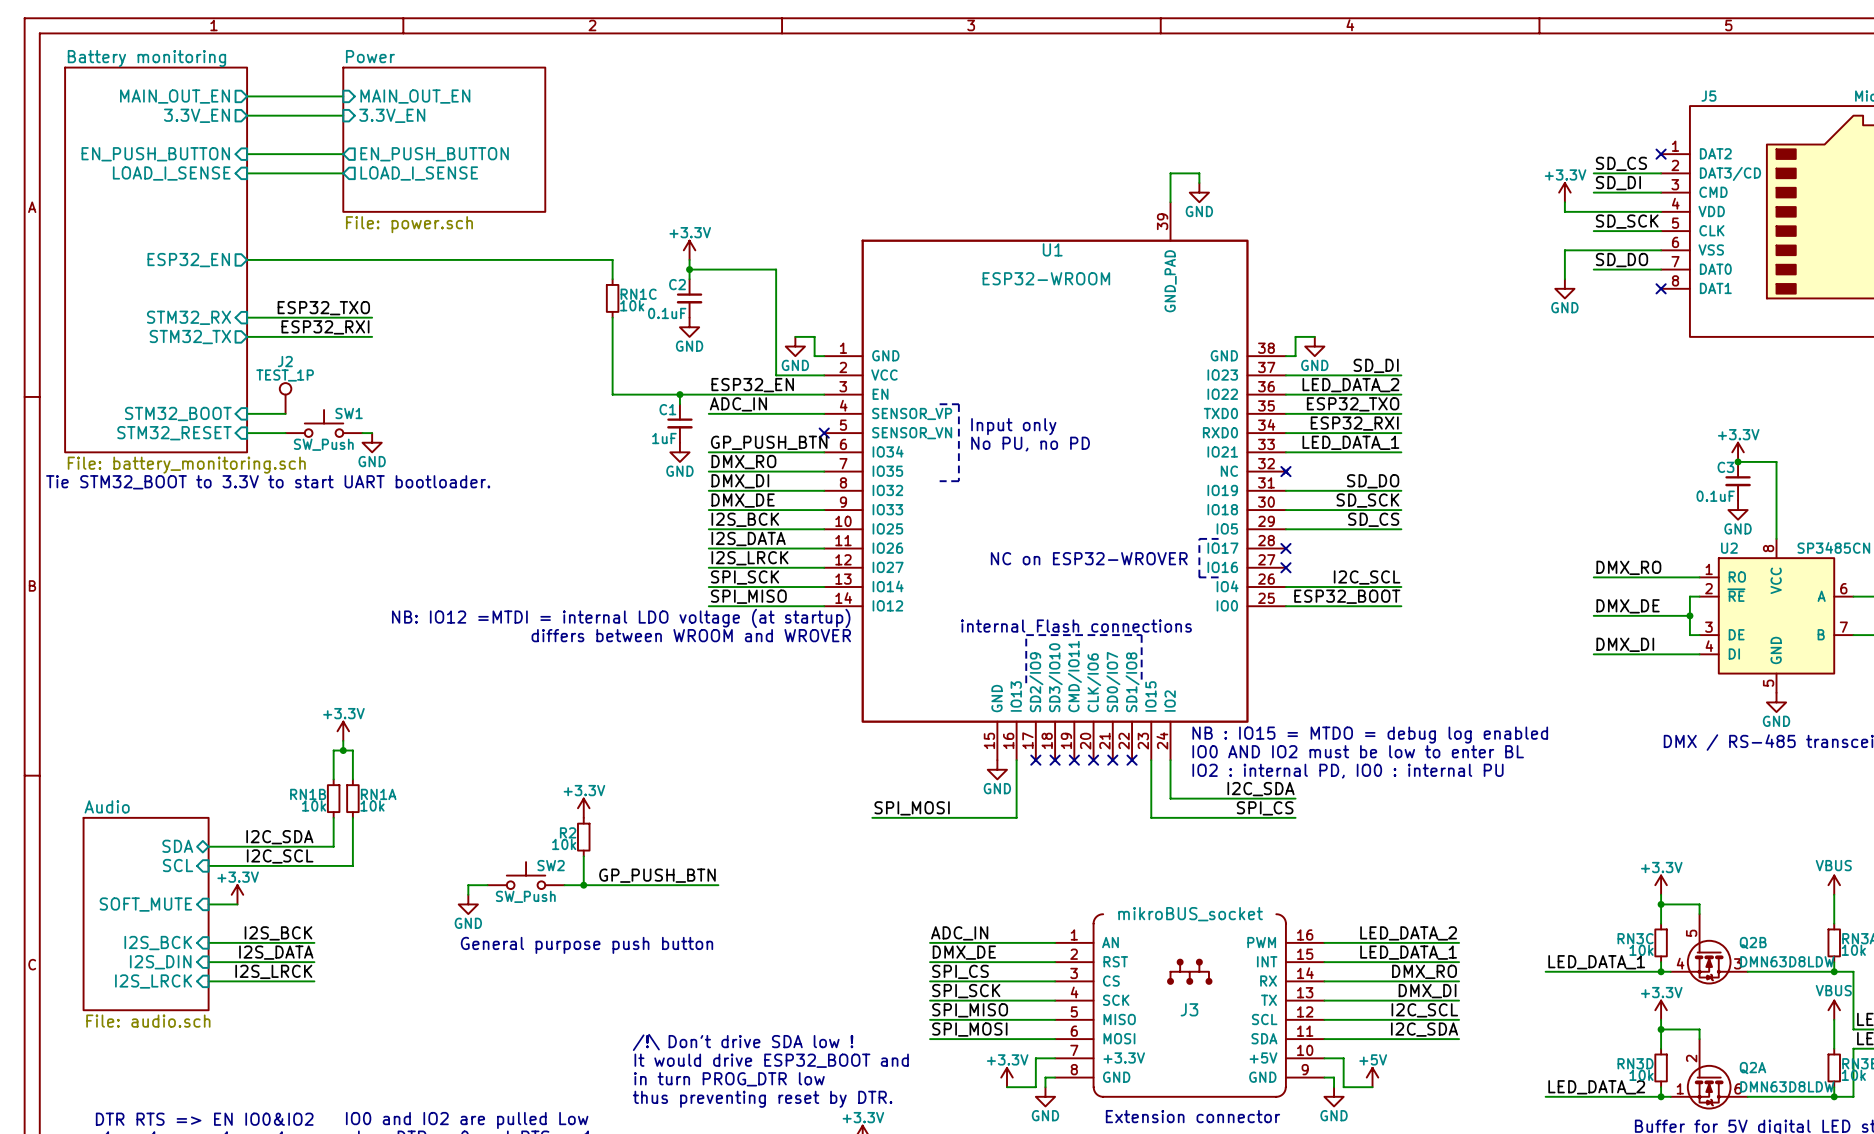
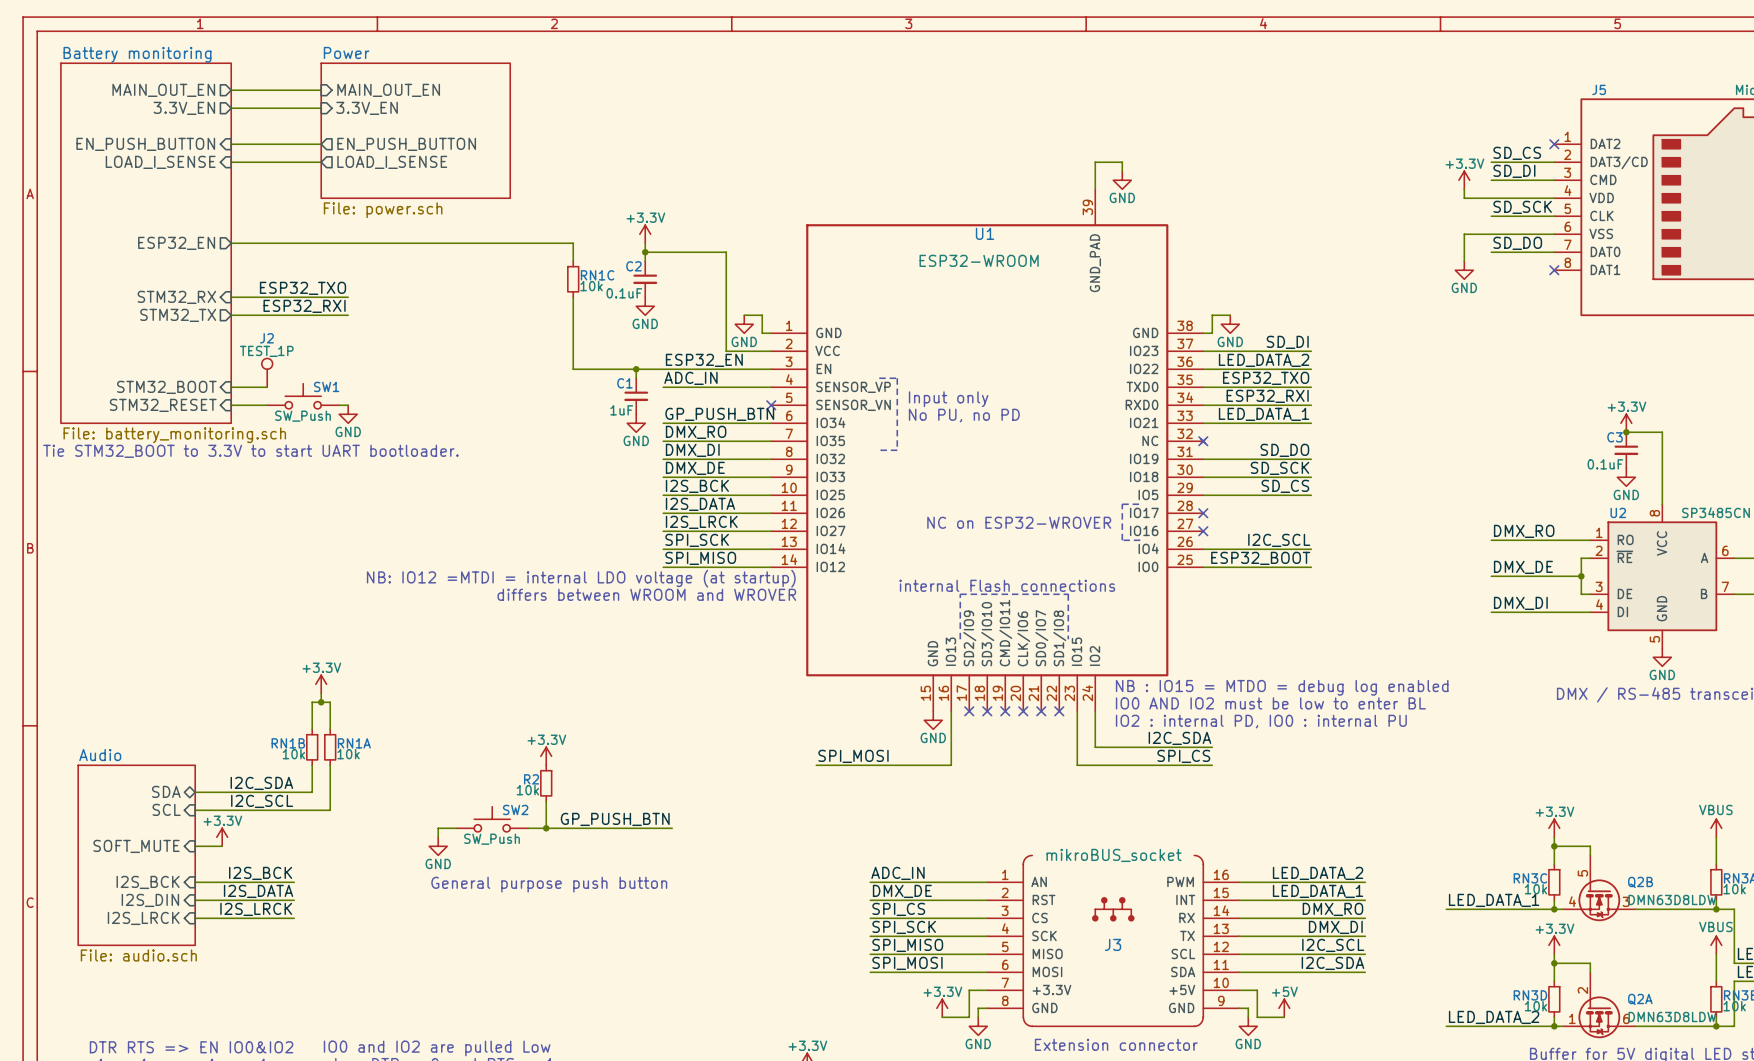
text: /!\ Don't drive SDA low ! (743, 1042) -> none
text: It would drive ESP32_BOOT and (771, 1060) -> none
text: in turn PROG_DTR low (729, 1079) -> none
text: thus preventing reset by DTR. (762, 1099) -> none

